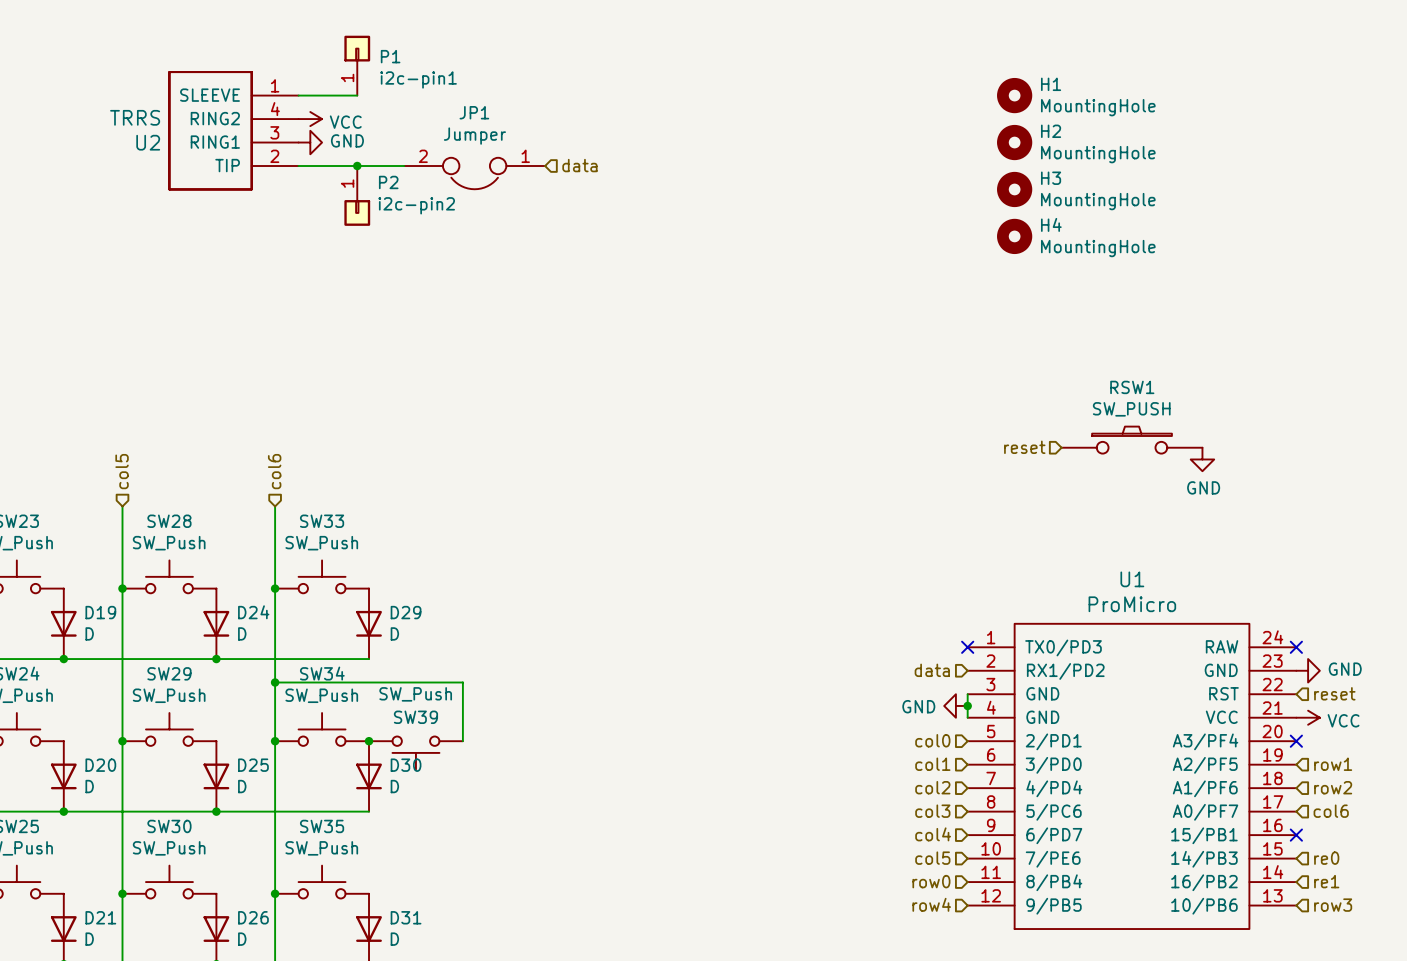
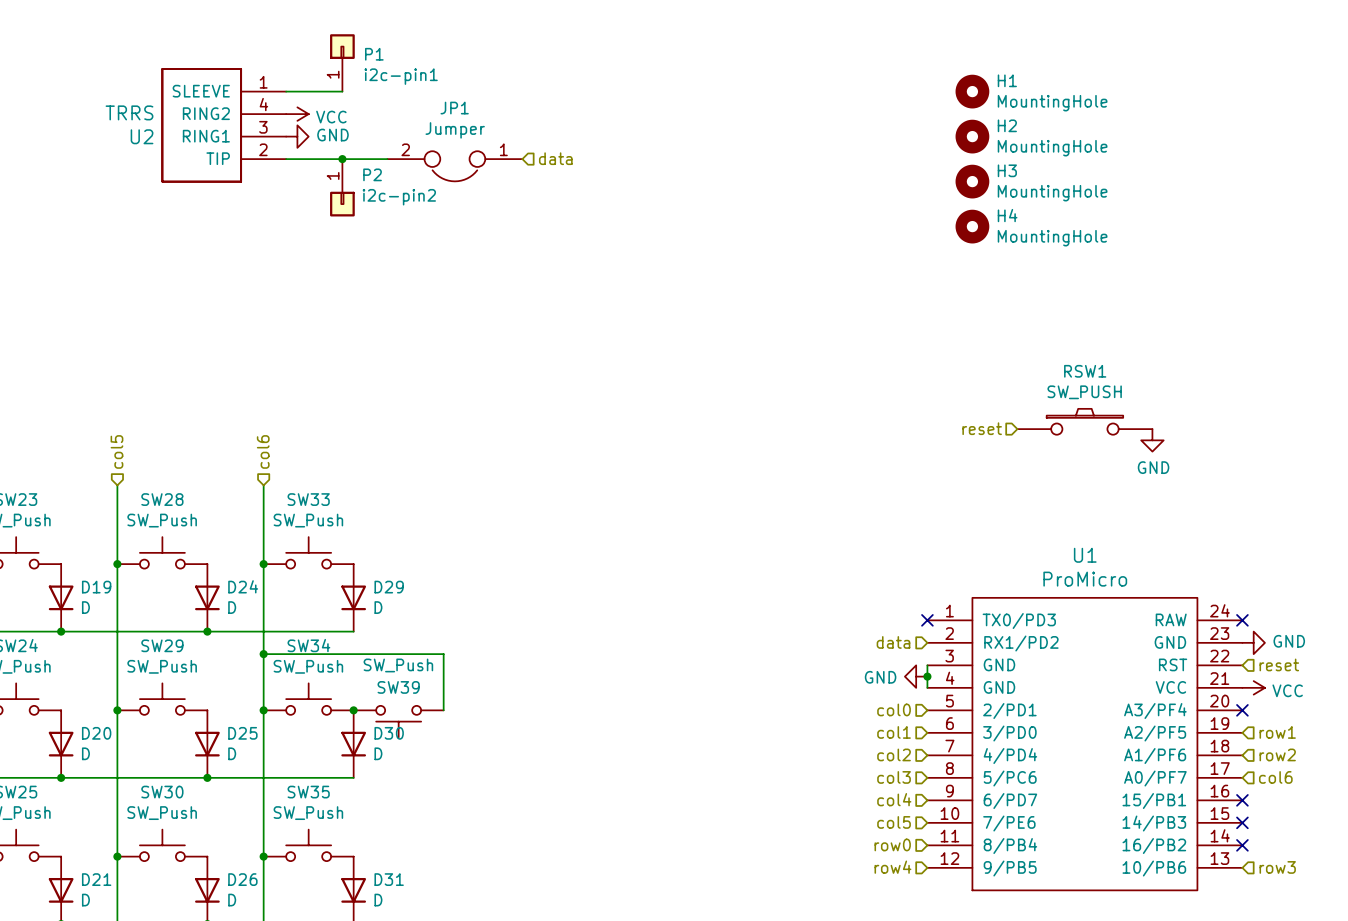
no-connect mark: none -> (1242, 822)
hierarchical label: re0 (1326, 858) -> none
hierarchical label: re1 (1326, 881) -> none
no-connect mark: none -> (1242, 845)

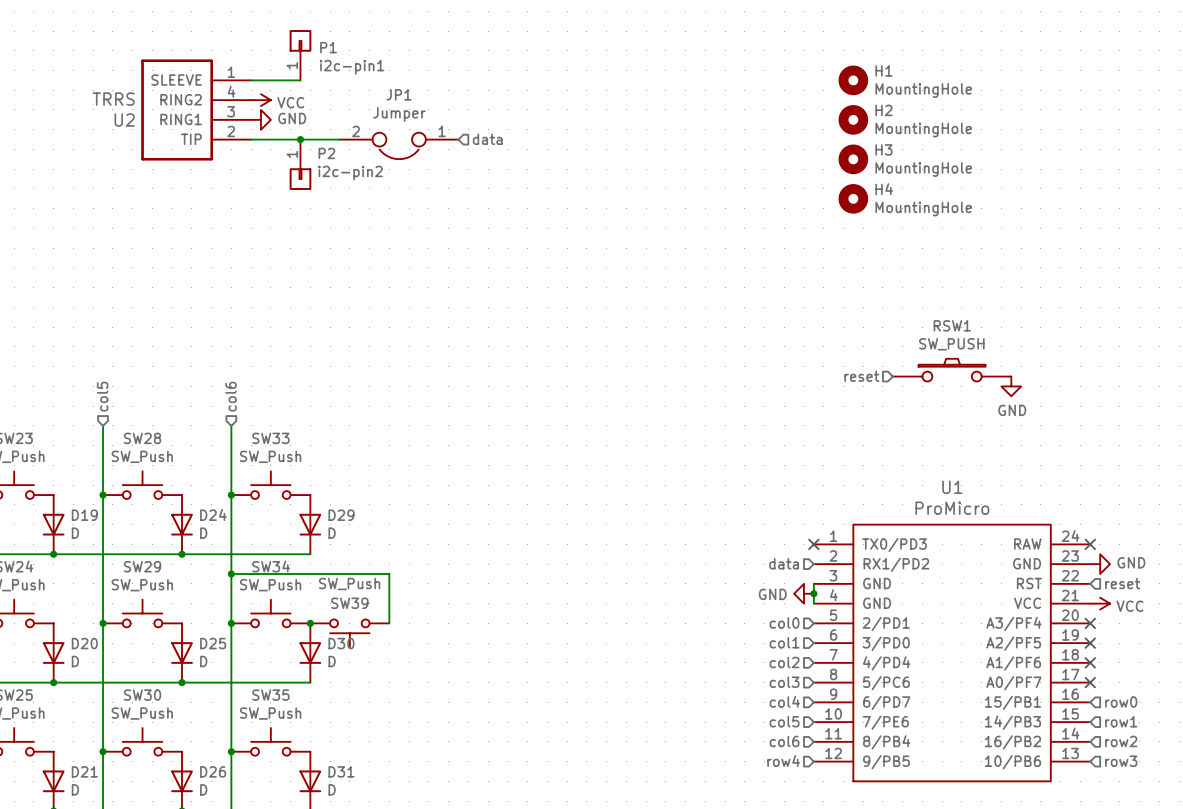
no-connect mark: none -> (1090, 643)
hierarchical label position: row1 (1277, 732) -> row1 (1121, 721)
hierarchical label position: row2 (1277, 754) -> row2 (1121, 741)
no-connect mark: none -> (1090, 662)
no-connect mark: none -> (1090, 682)
hierarchical label: col6 (1275, 777) -> none
hierarchical label: none -> row0 (1121, 701)
no-connect mark: (1242, 800) -> none
no-connect mark: (1242, 822) -> none
hierarchical label: row0 (892, 844) -> col6 (784, 741)
no-connect mark: (1242, 845) -> none

